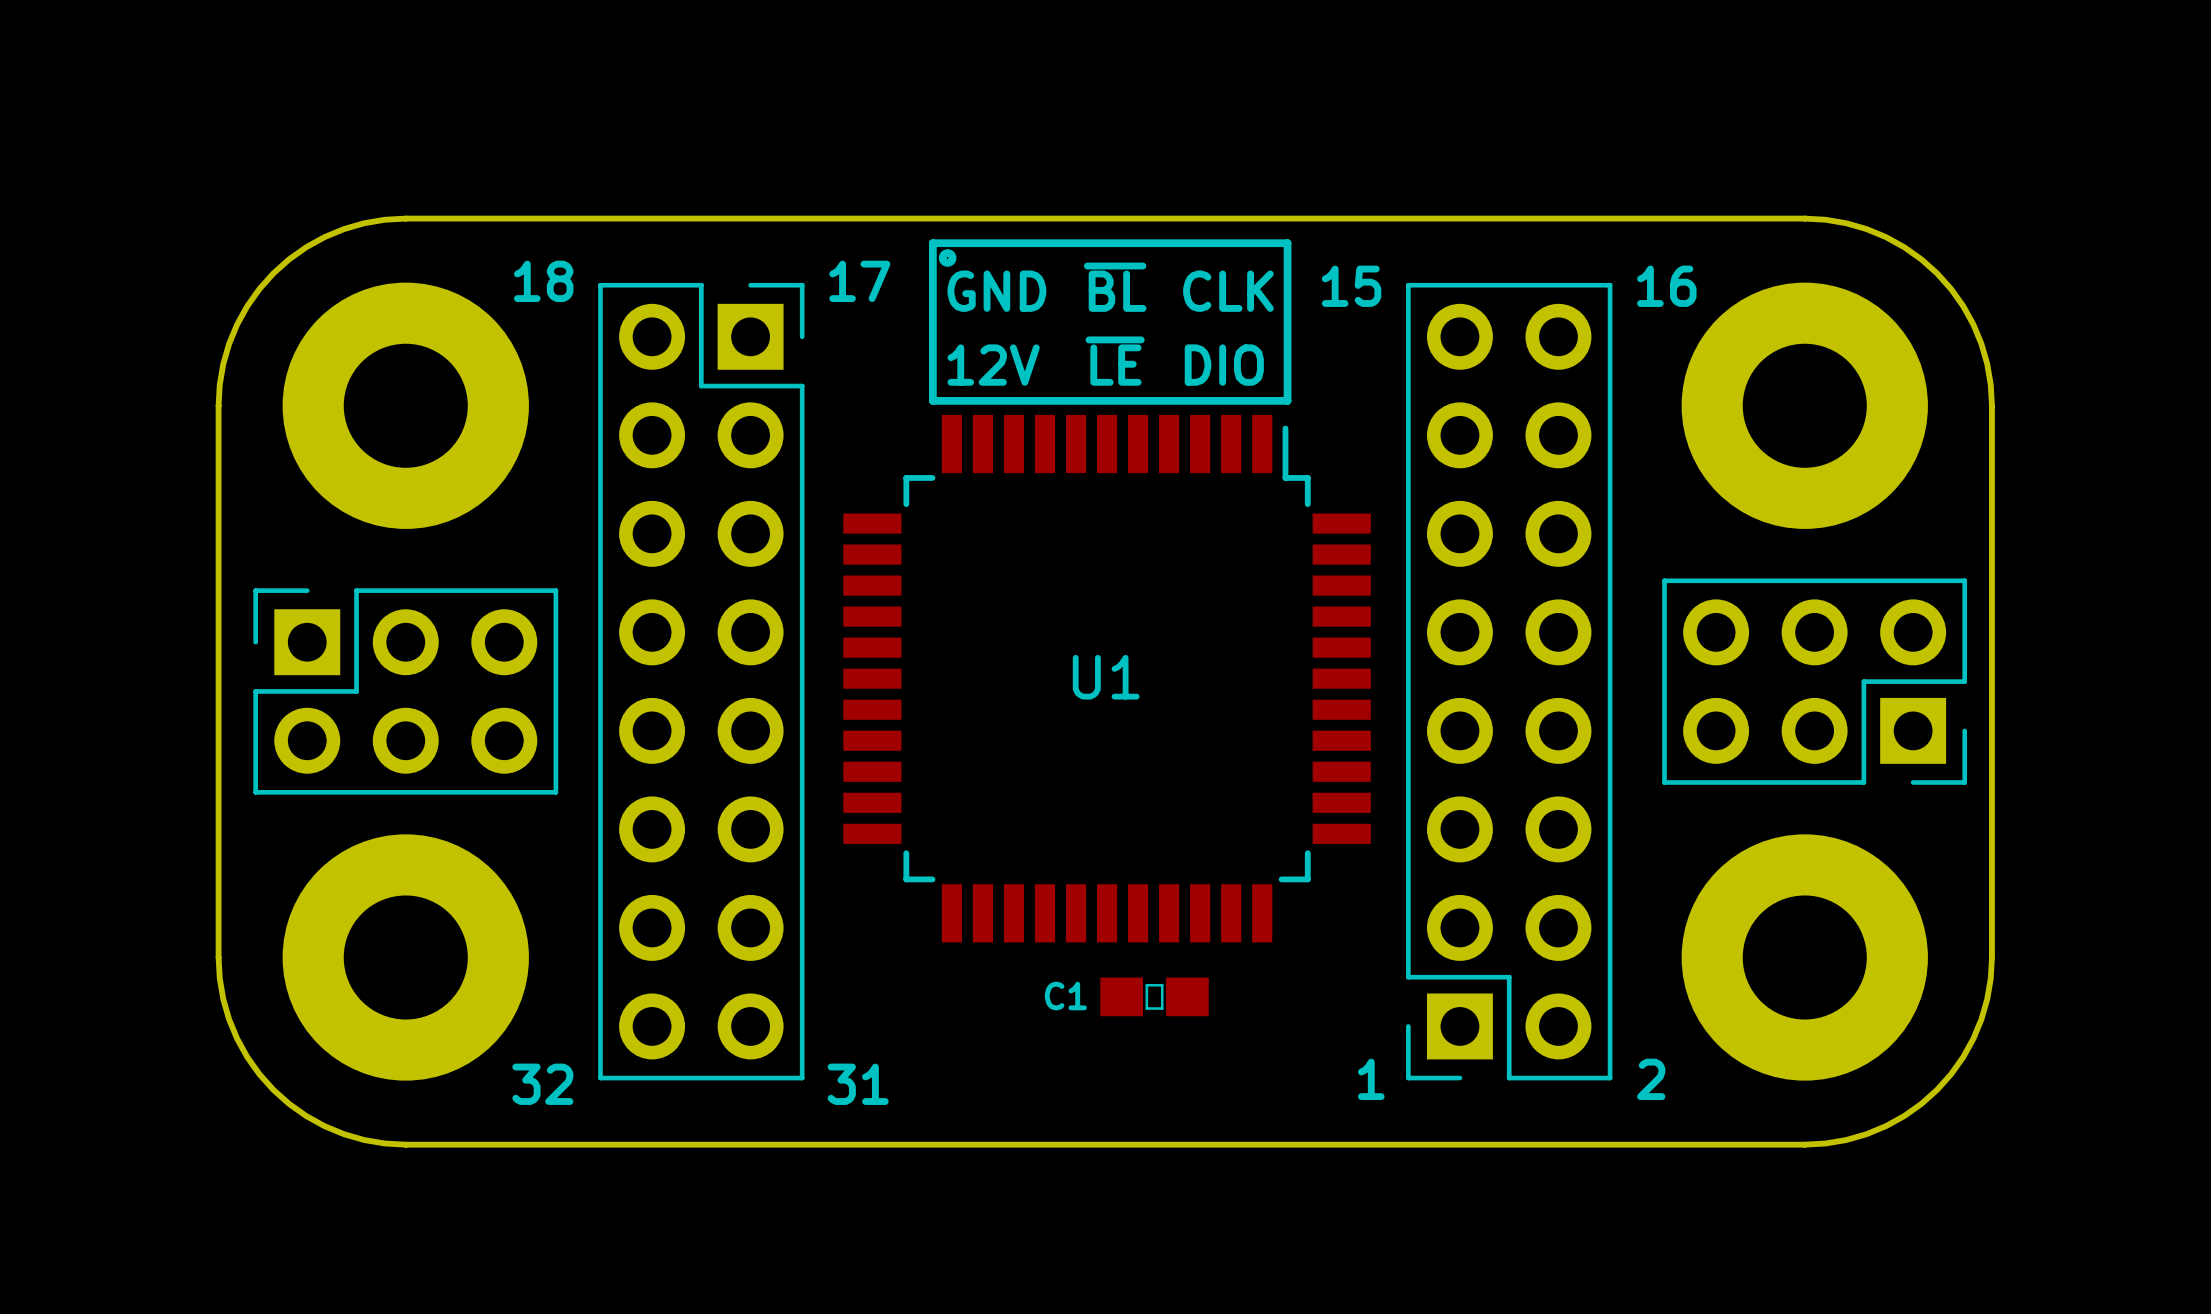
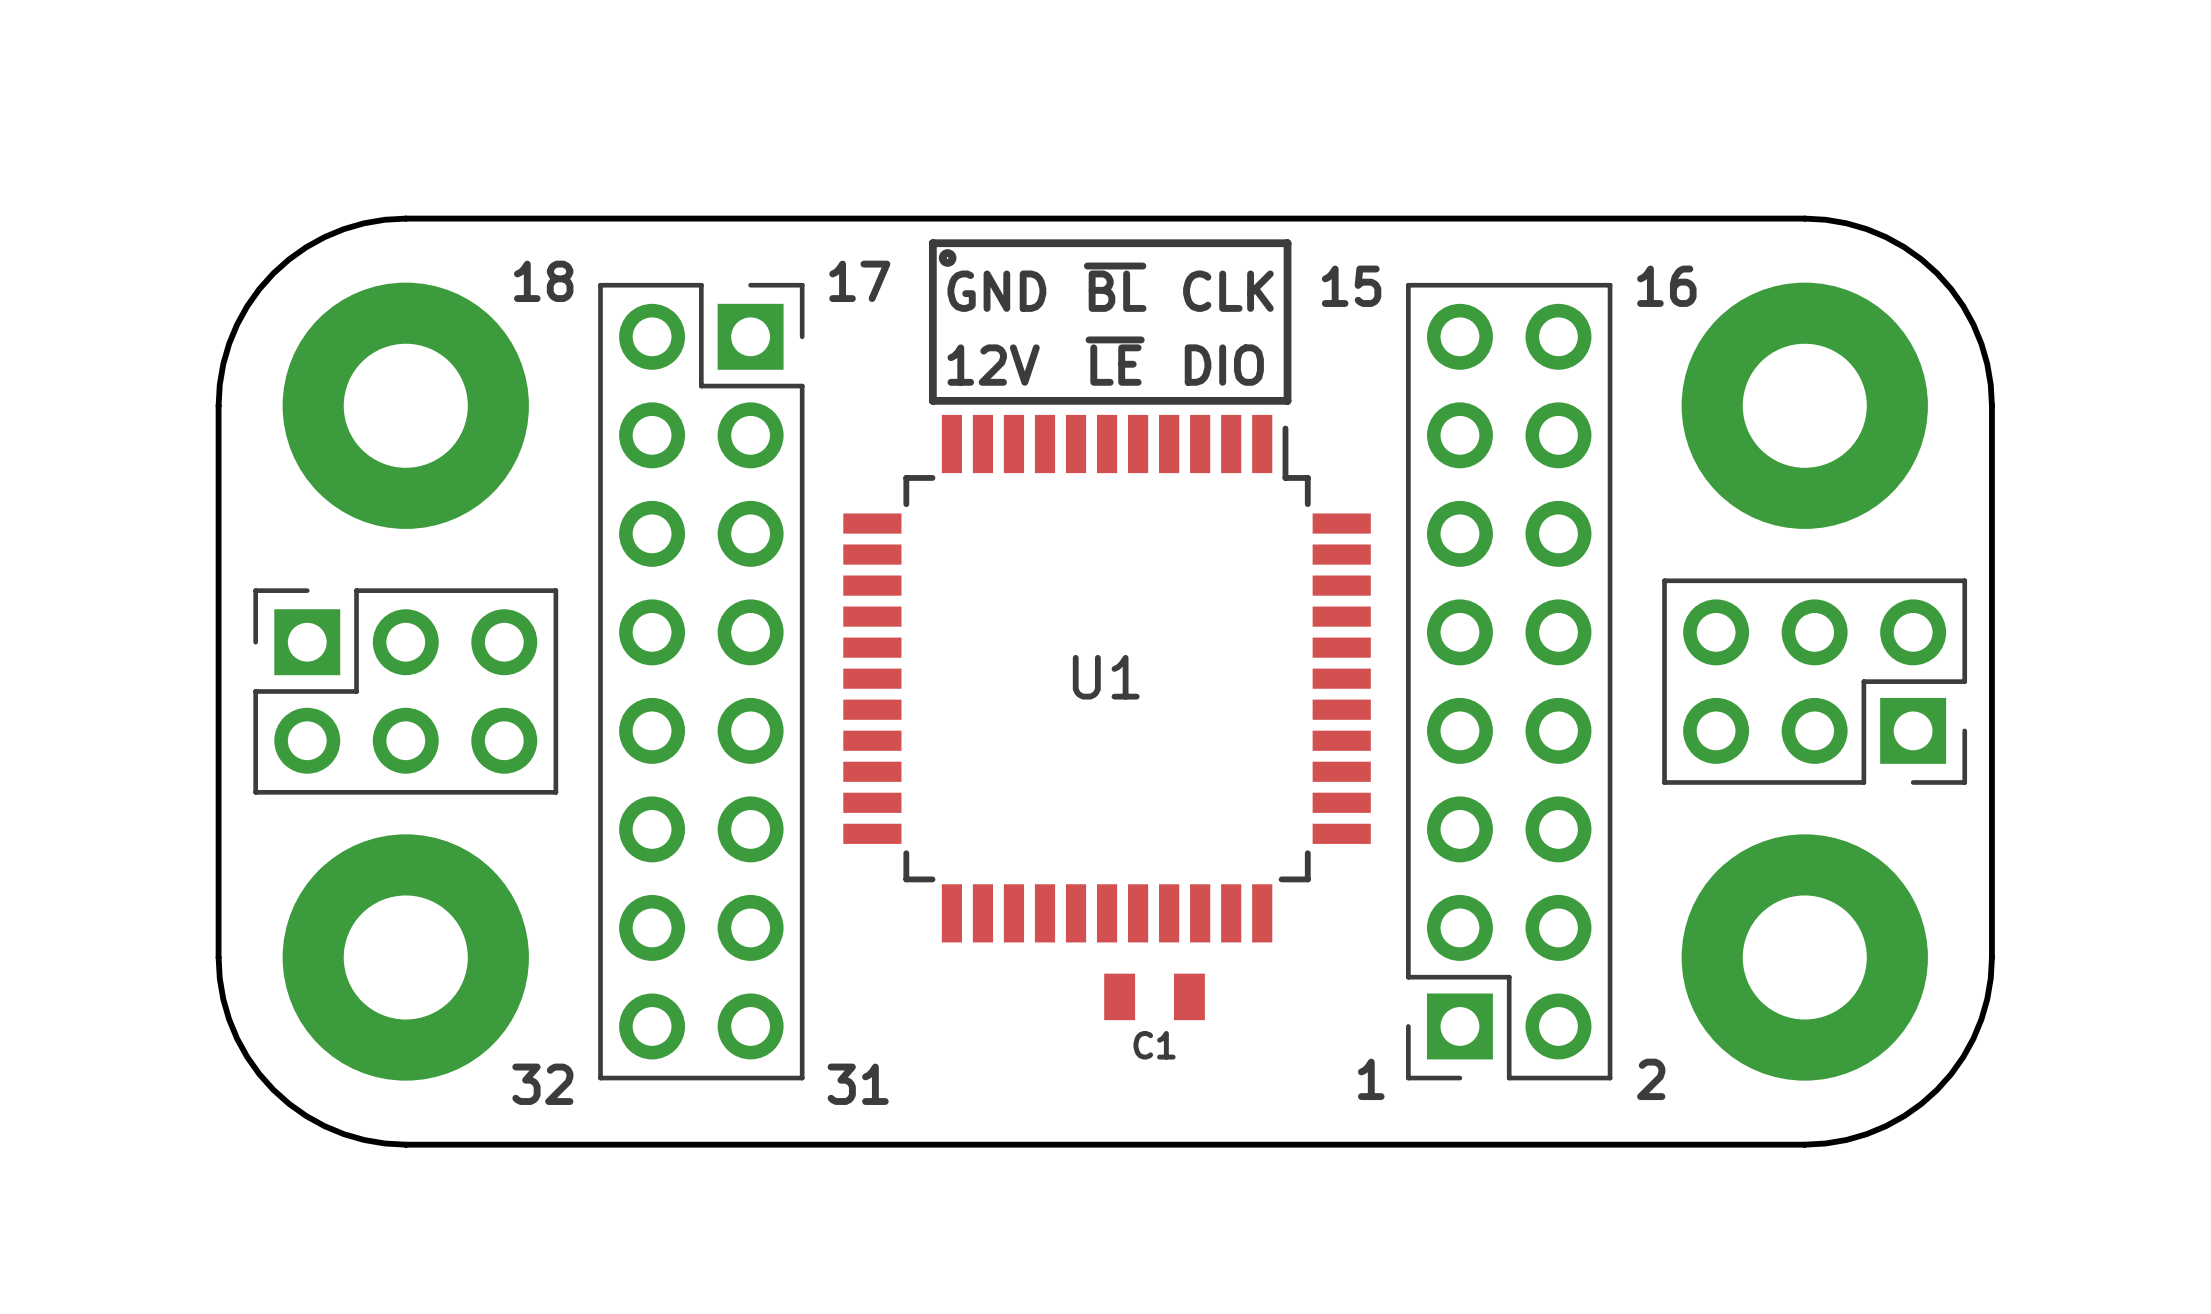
C1 footprint: [1100, 977, 1209, 1017] -> [1104, 973, 1205, 1021]
C1 name position: C1 (1065, 996) -> C1 (1154, 1045)

